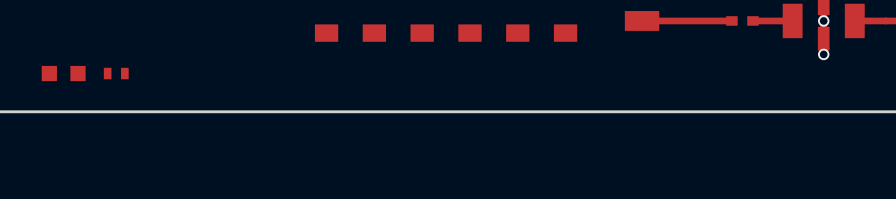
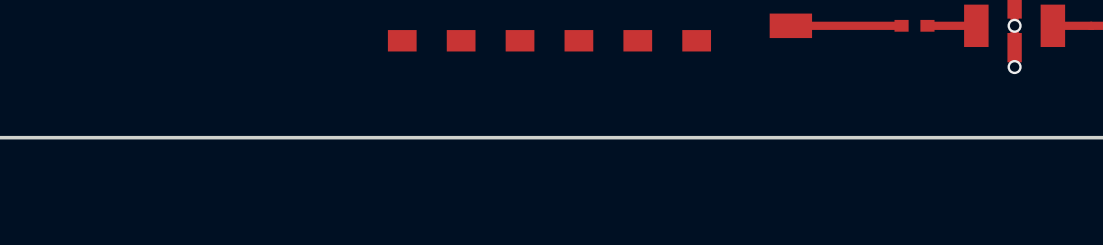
part: (63, 73) -> none
part: (116, 73) -> none

